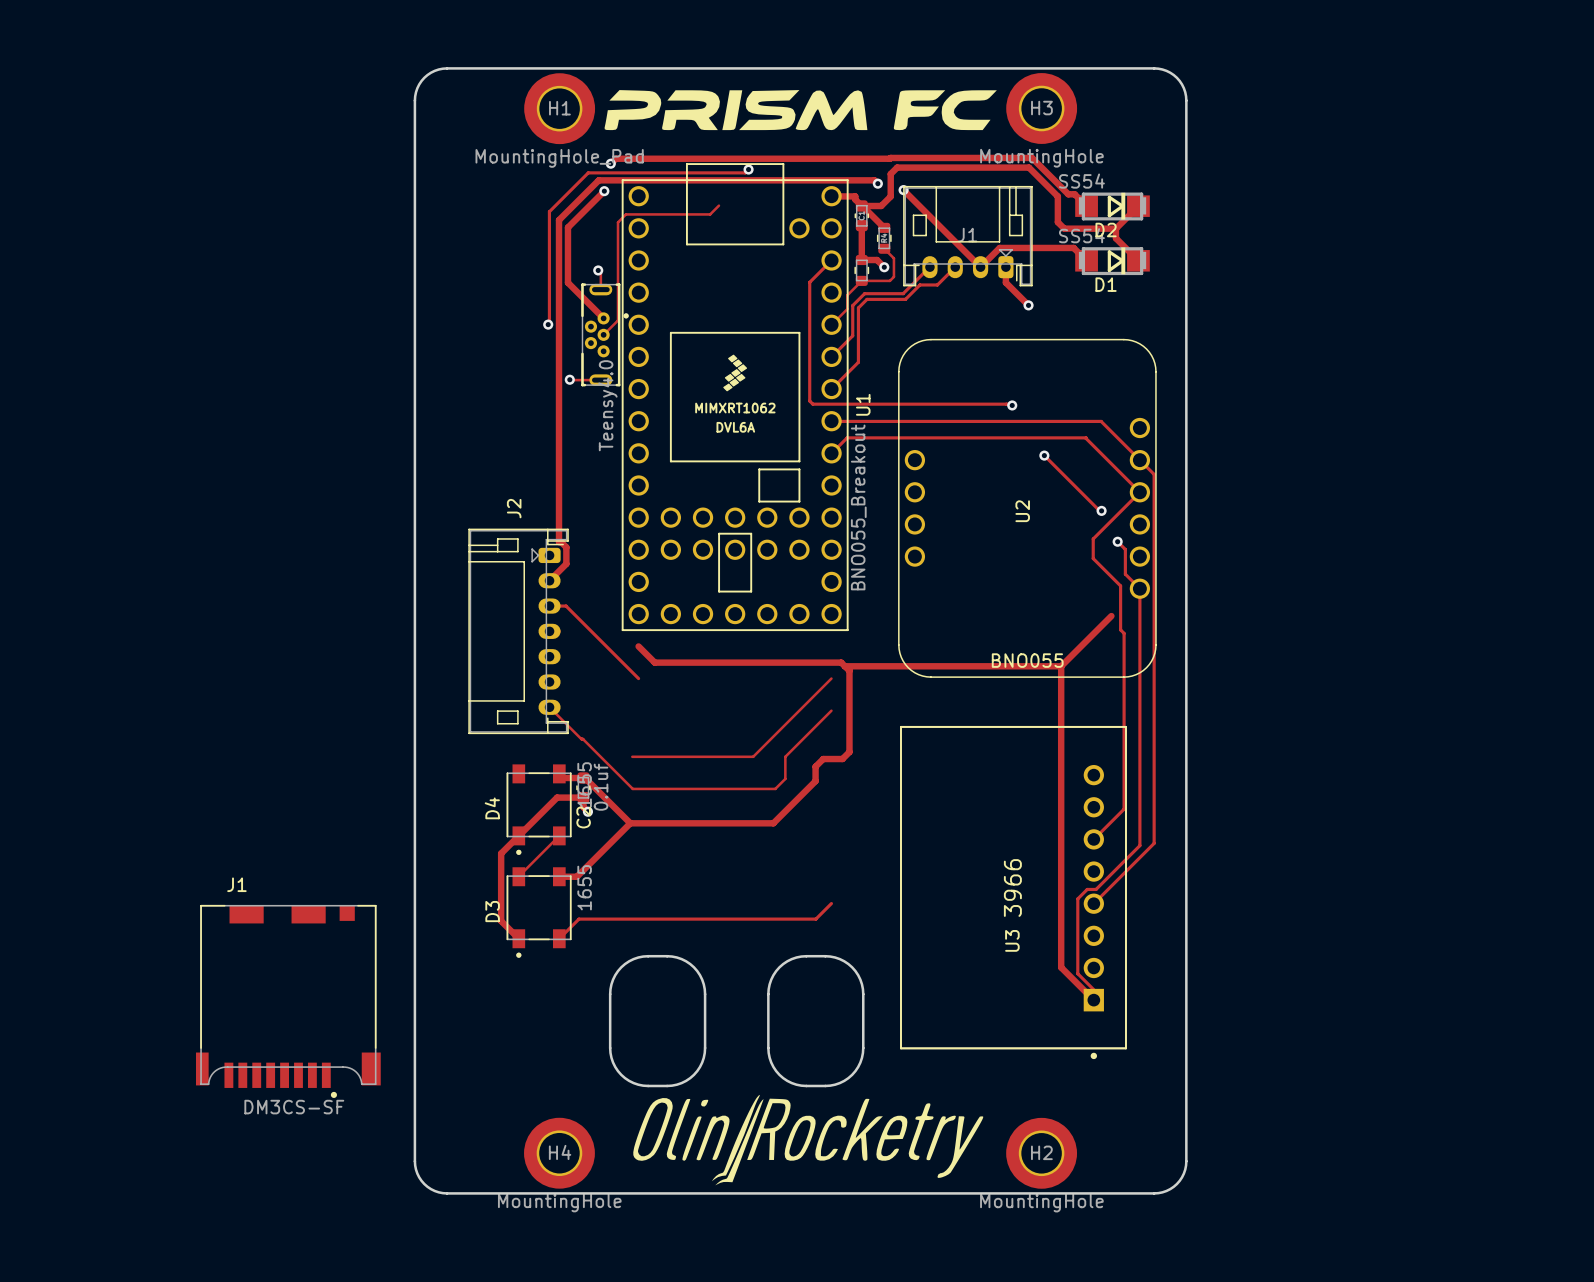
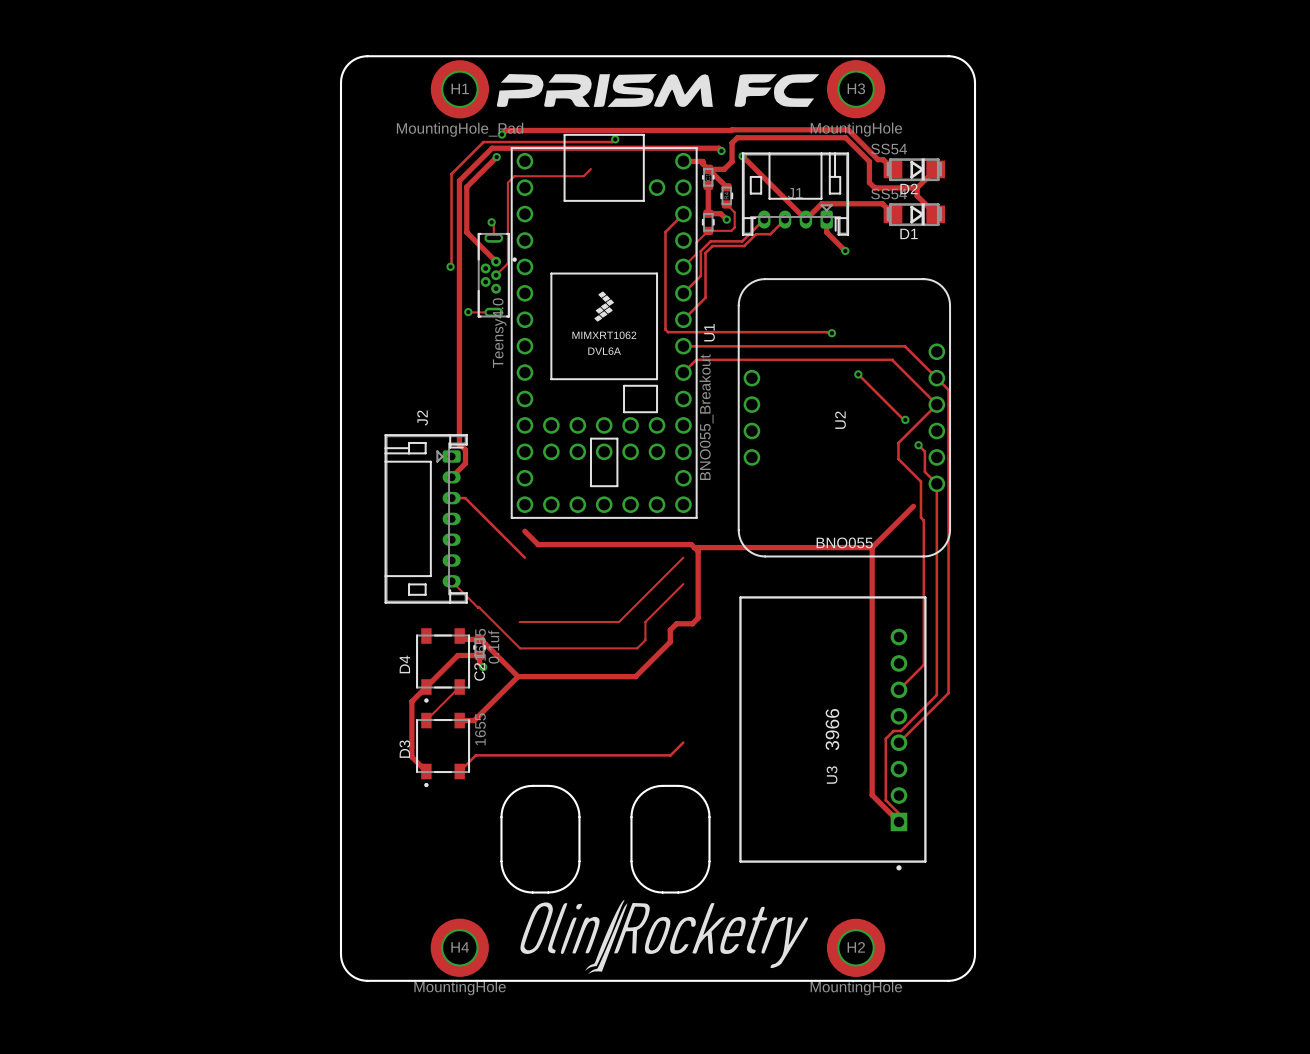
J1: DM3CS-SF (288, 1001) -> none

